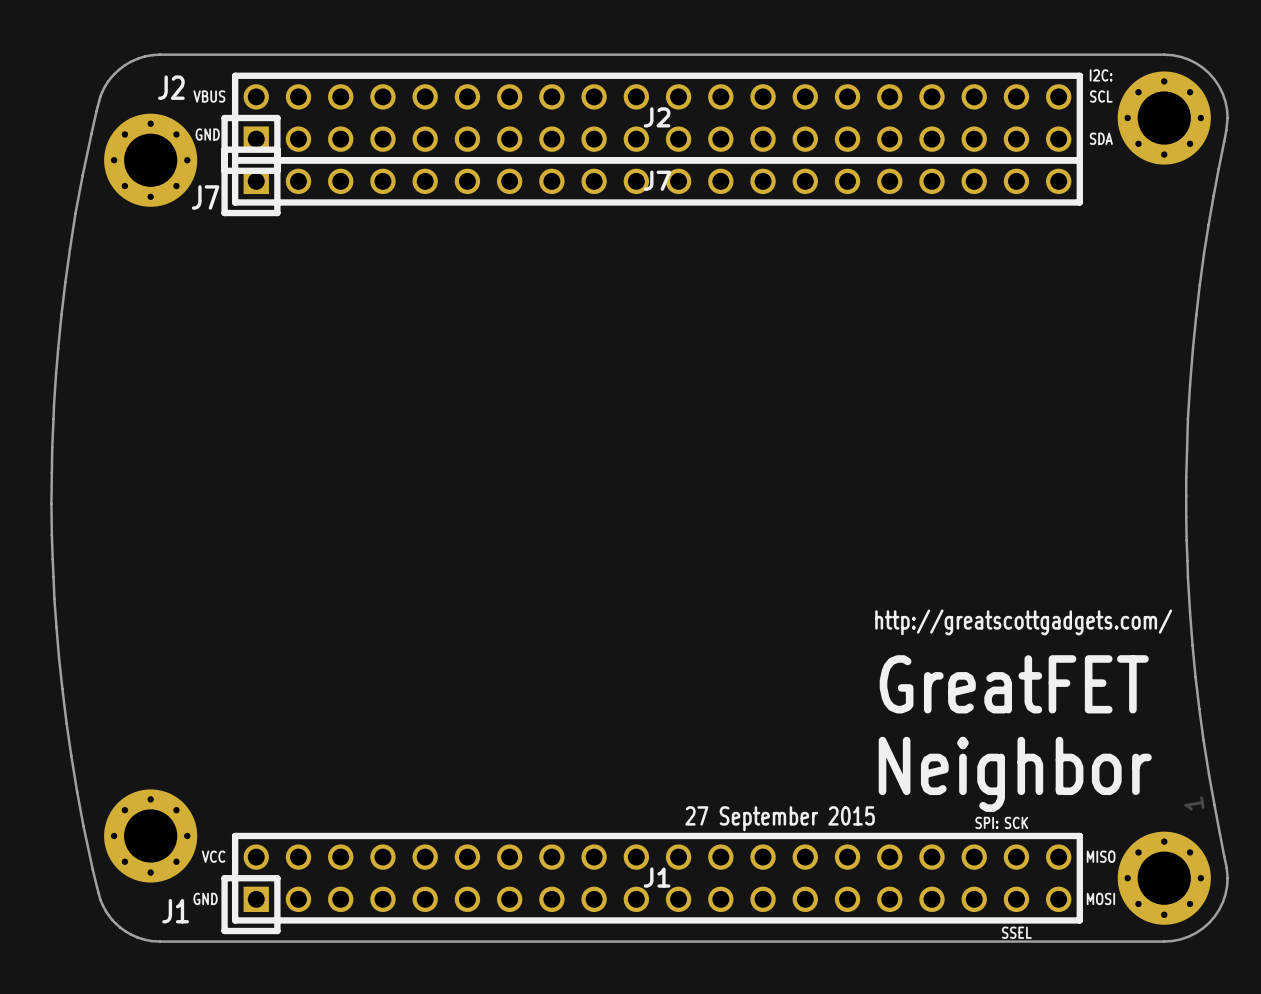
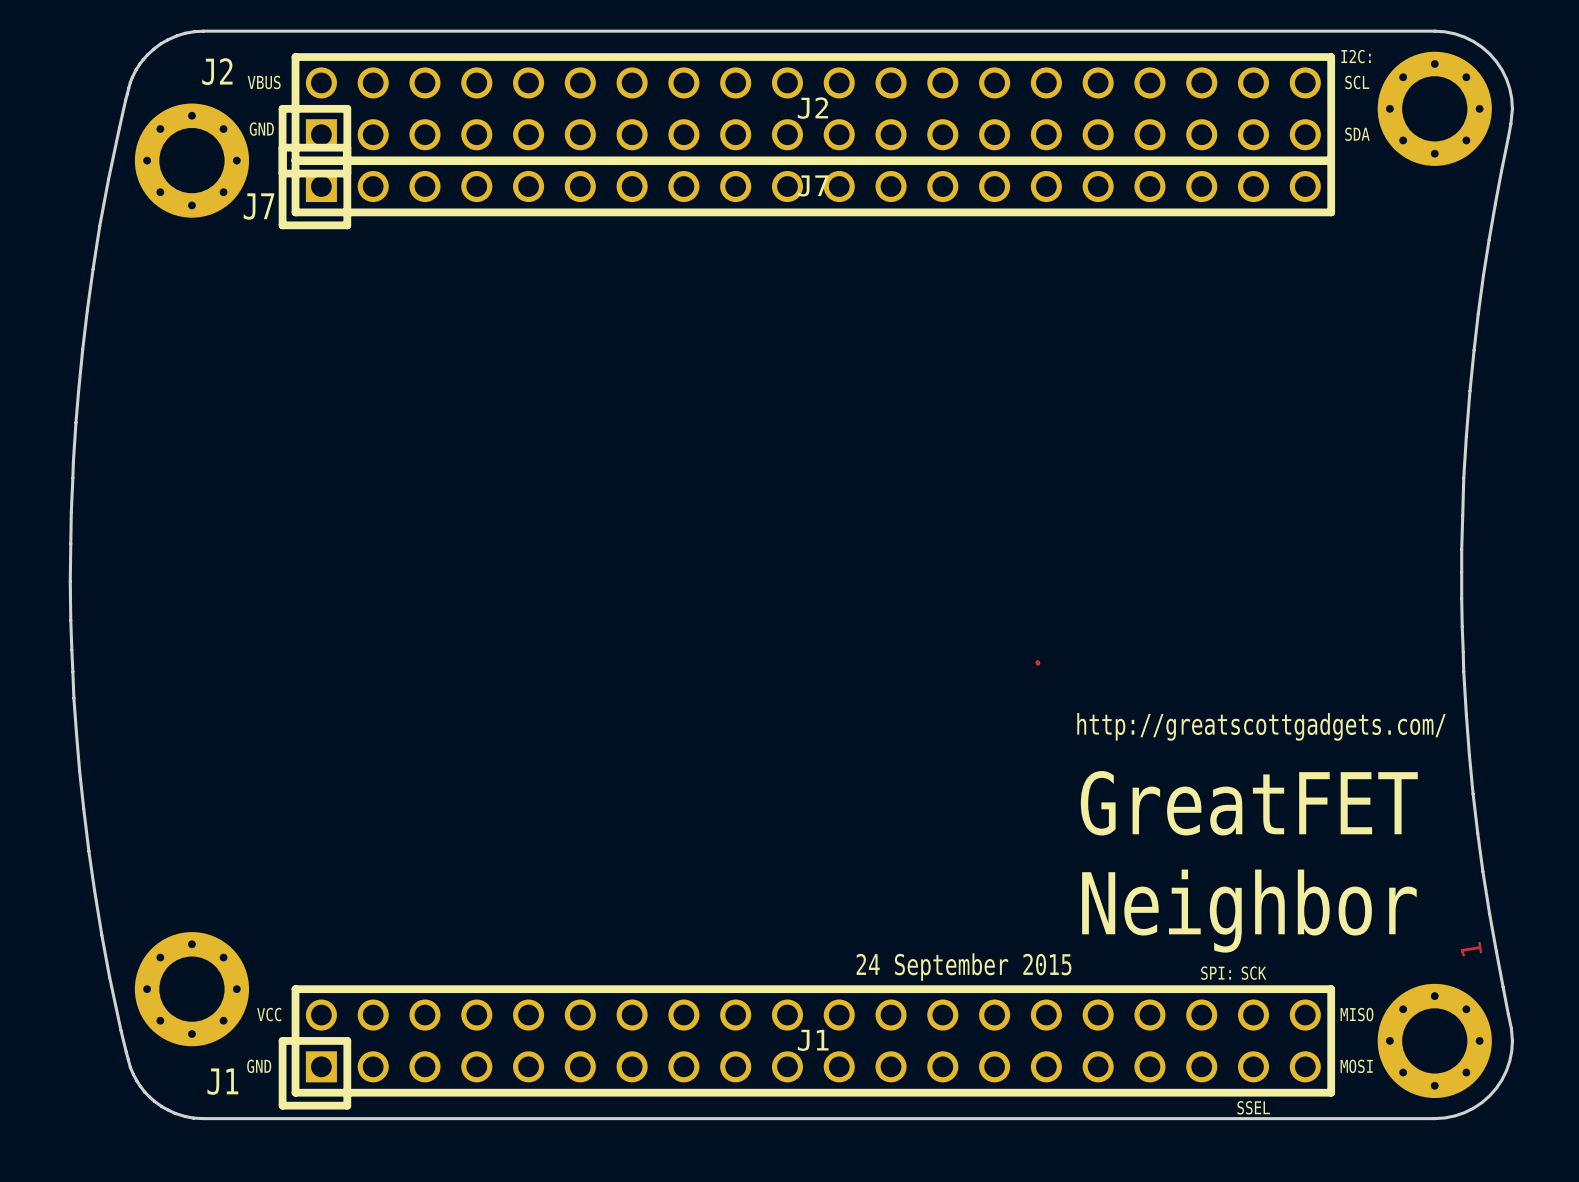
track: none -> (1037, 662) (1038, 662) (1038, 663) (1037, 662)
text: 27 September 2015 (780, 818) -> 24 September 2015 (963, 967)

